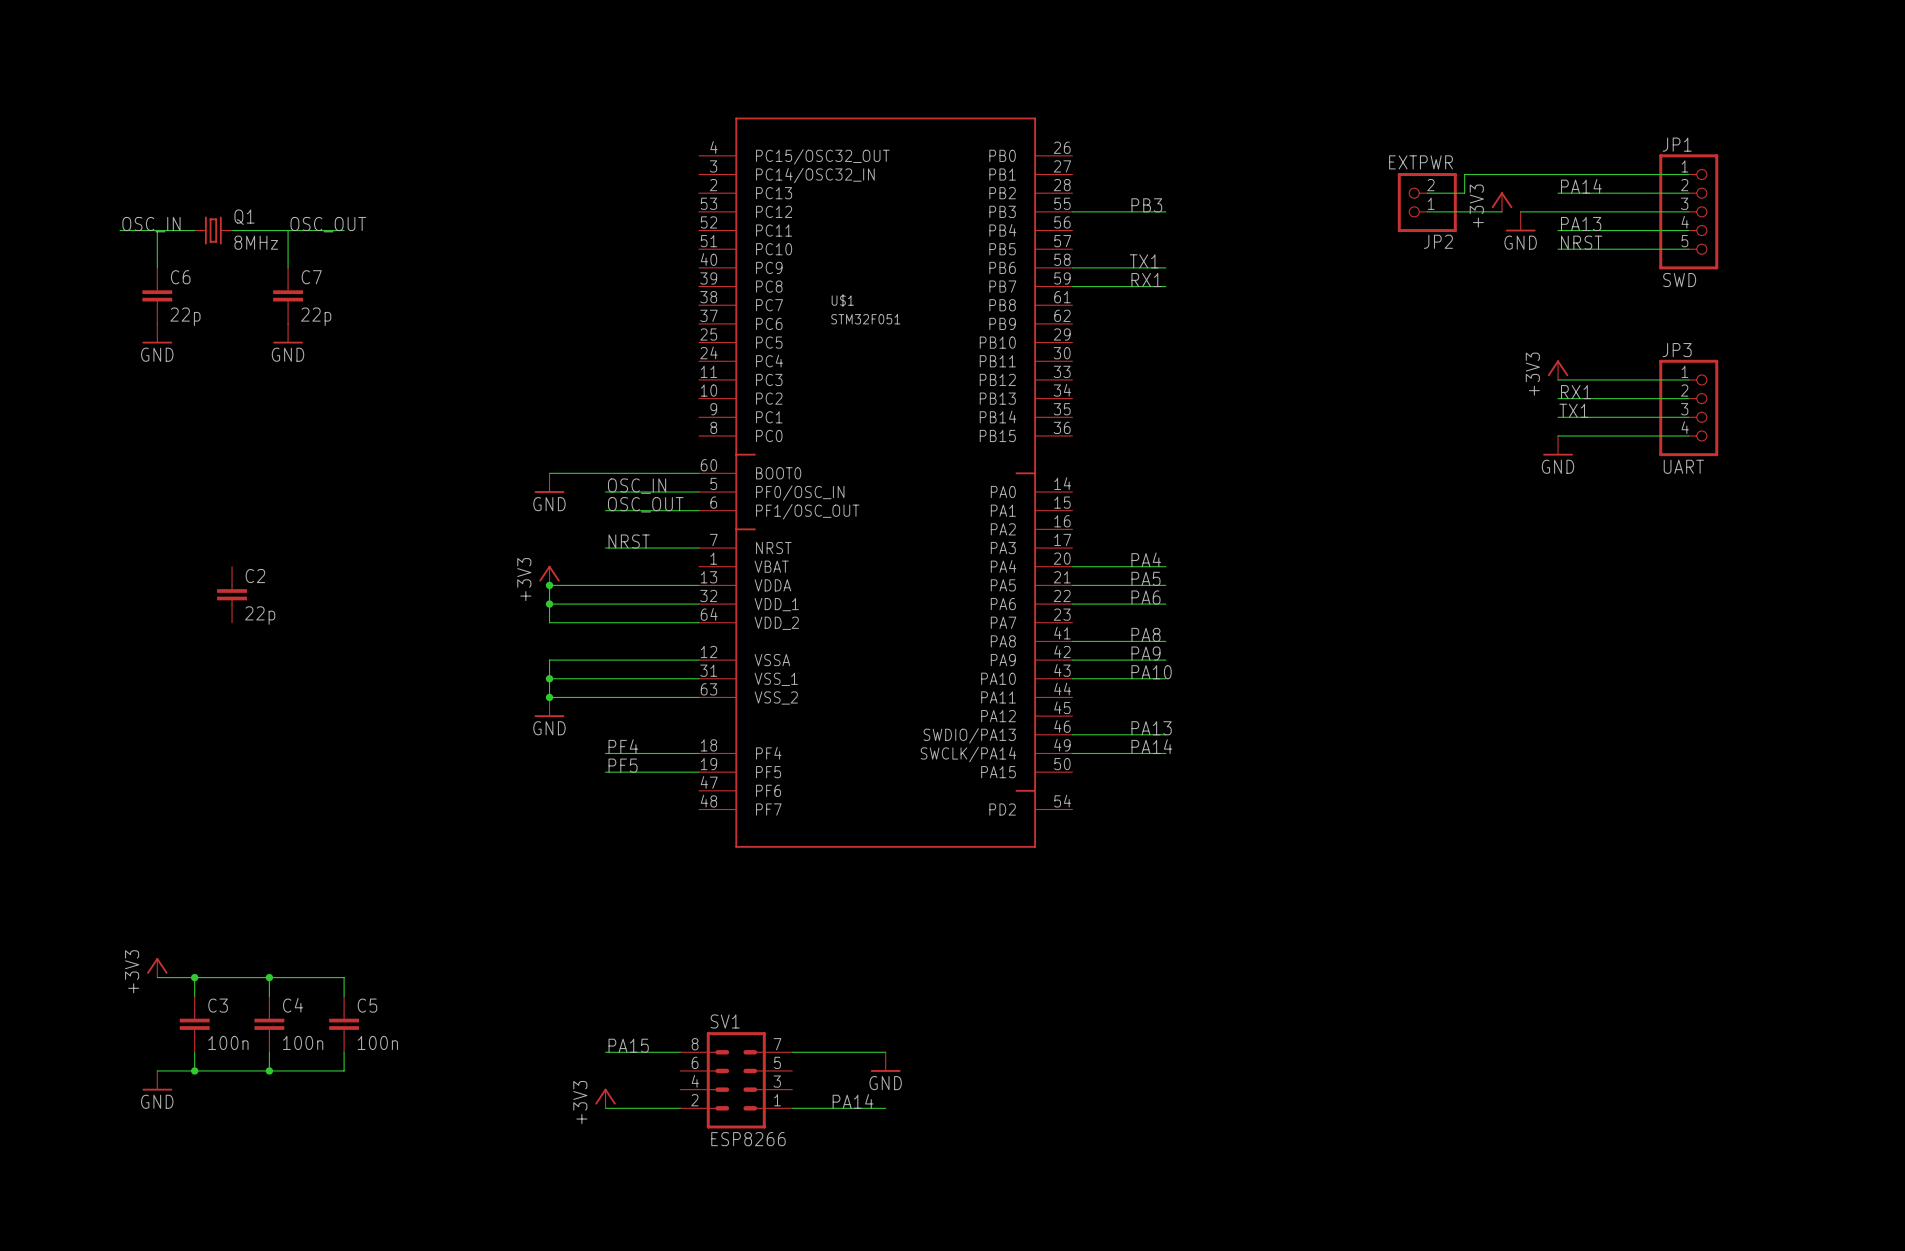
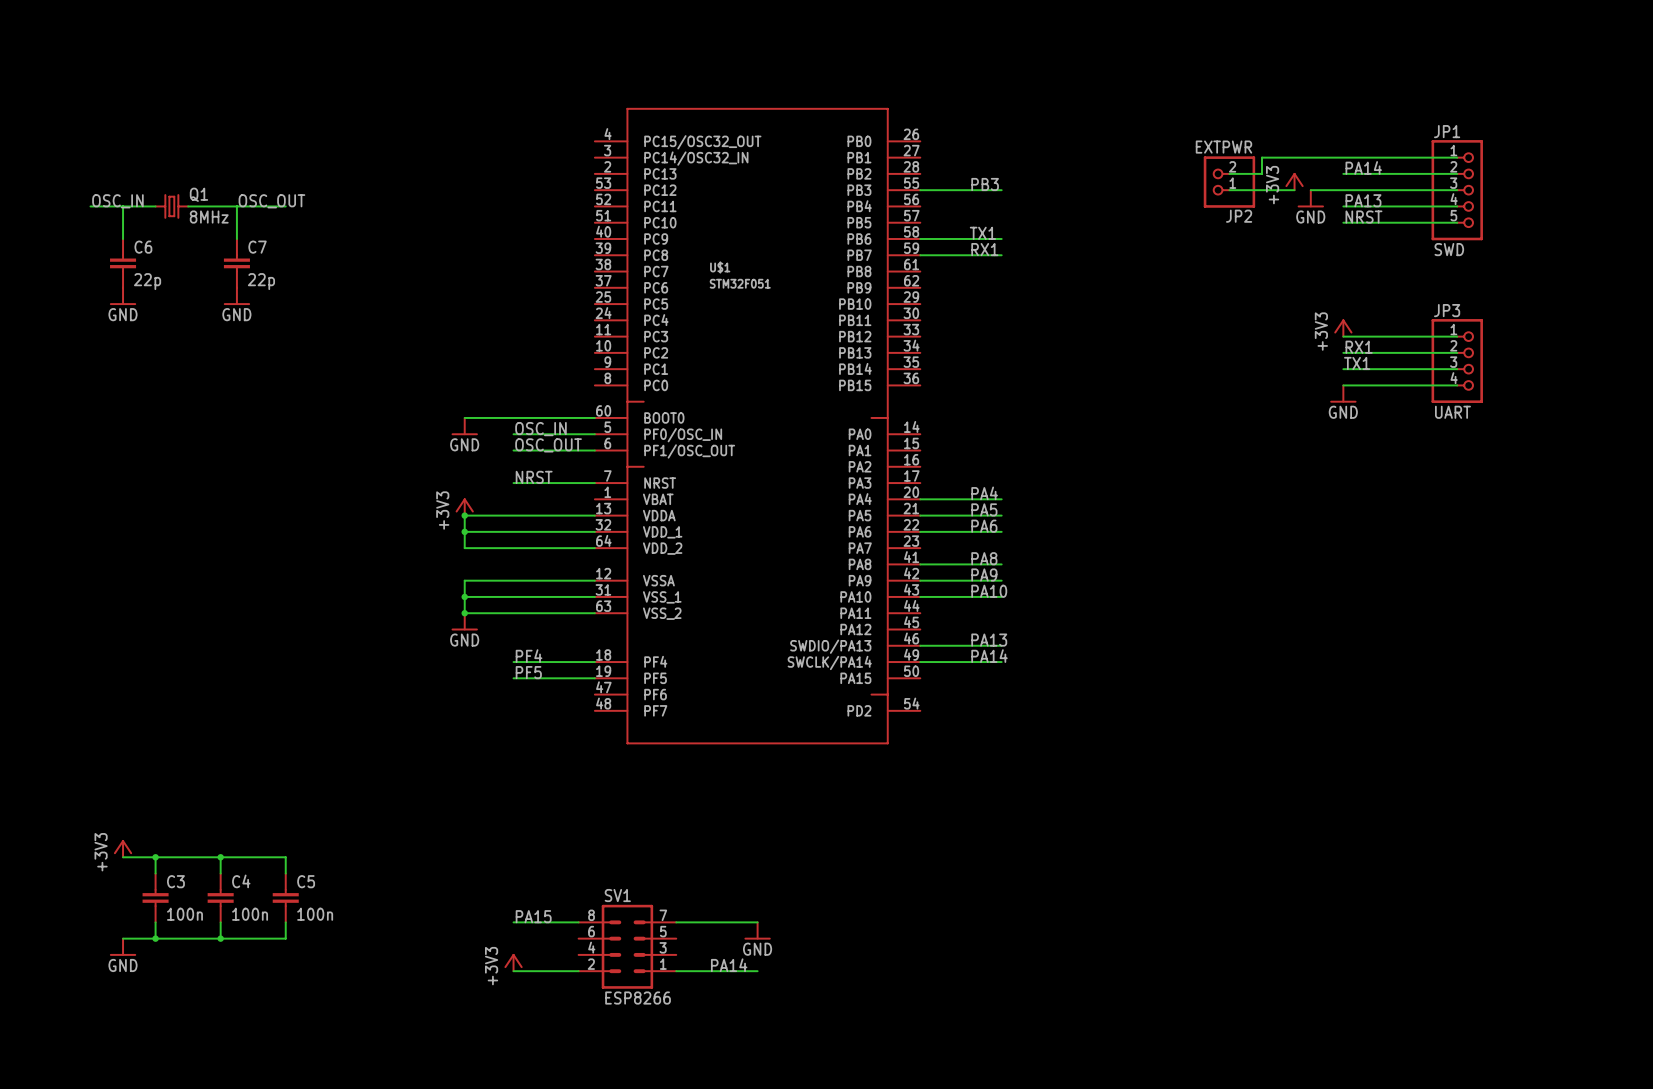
C2: 22p (232, 594) -> none

